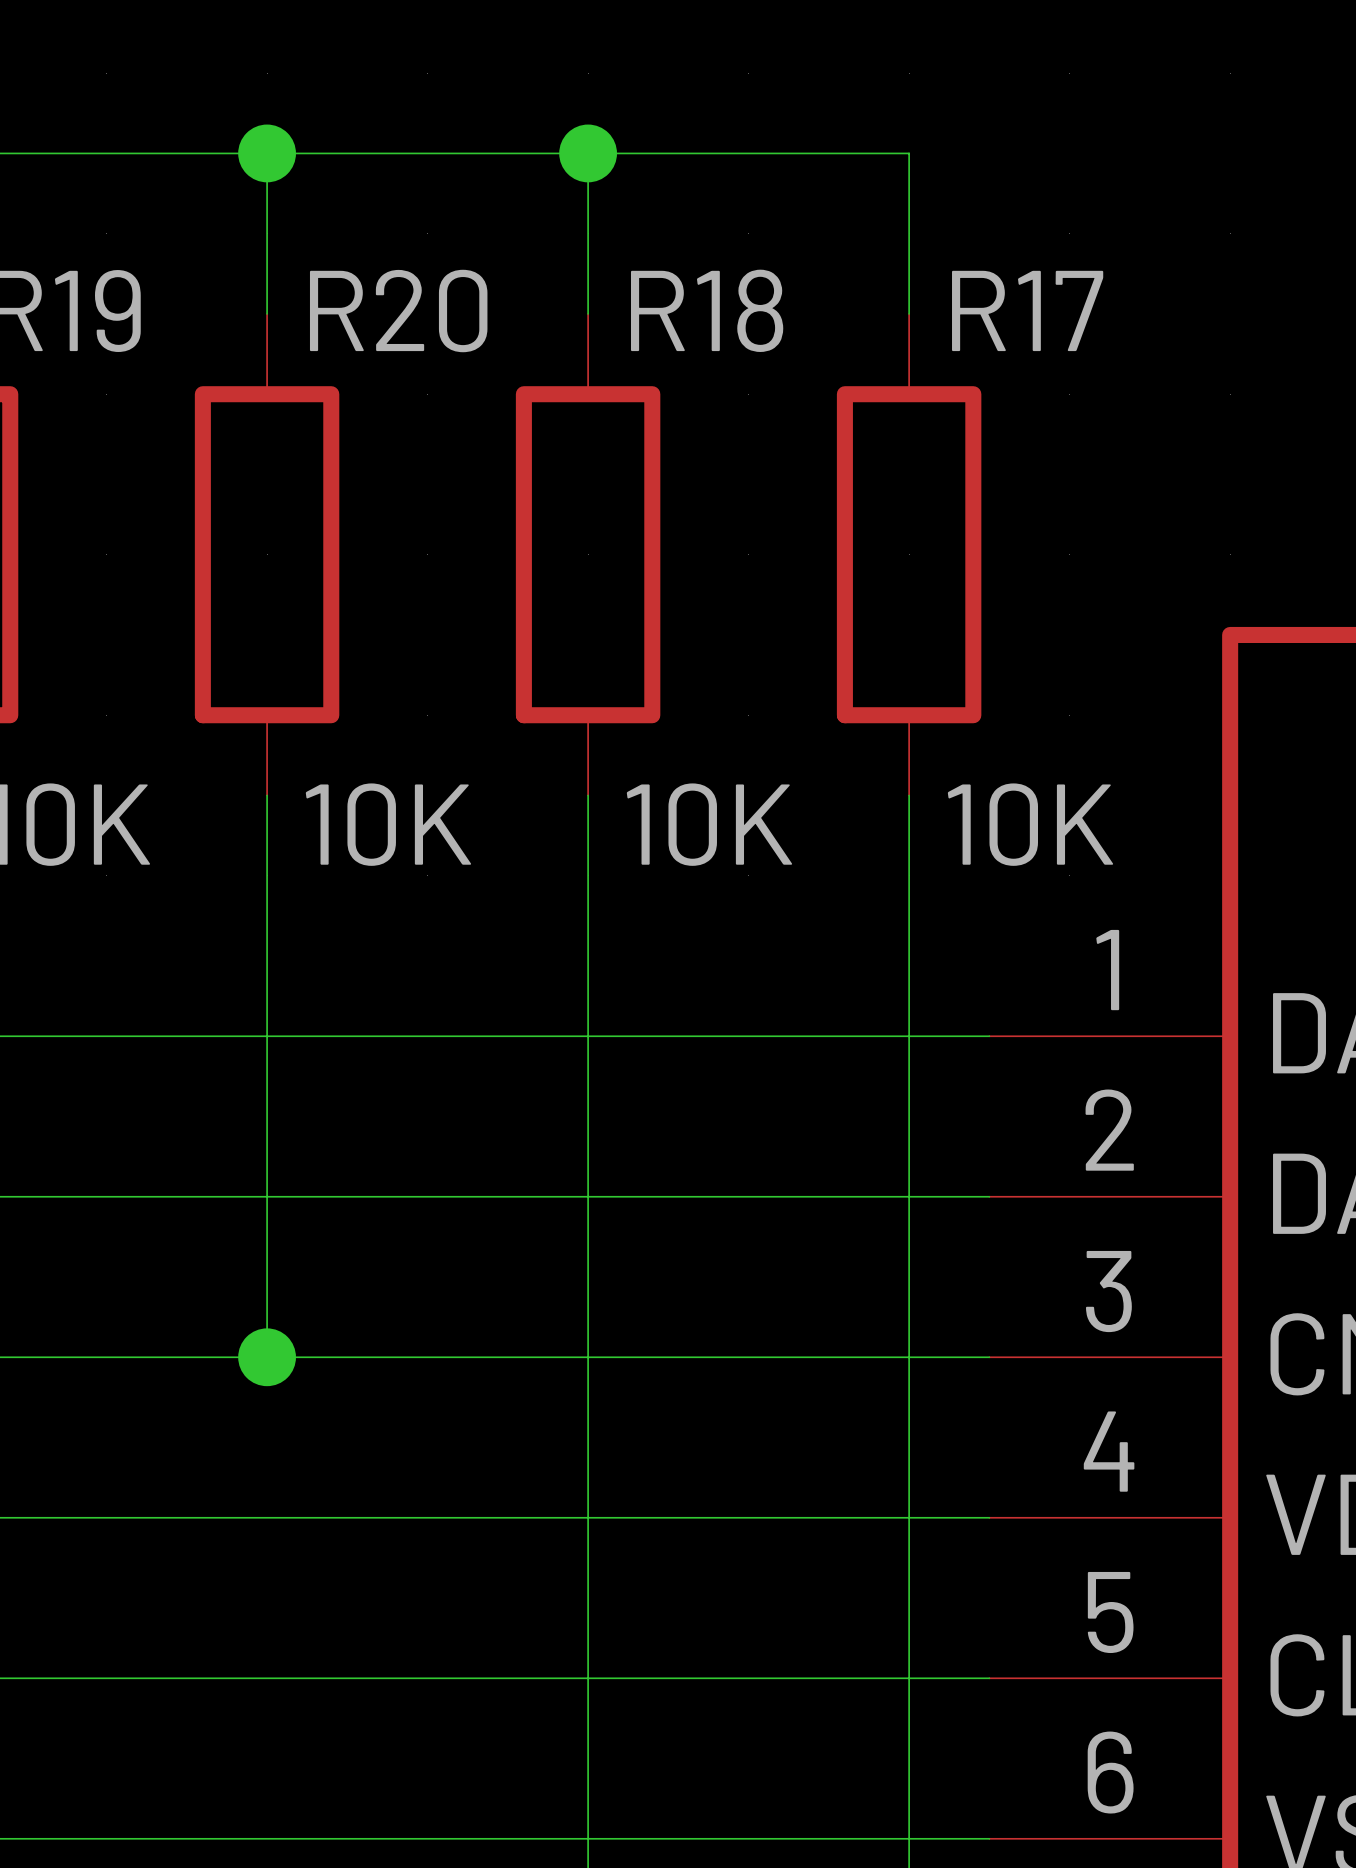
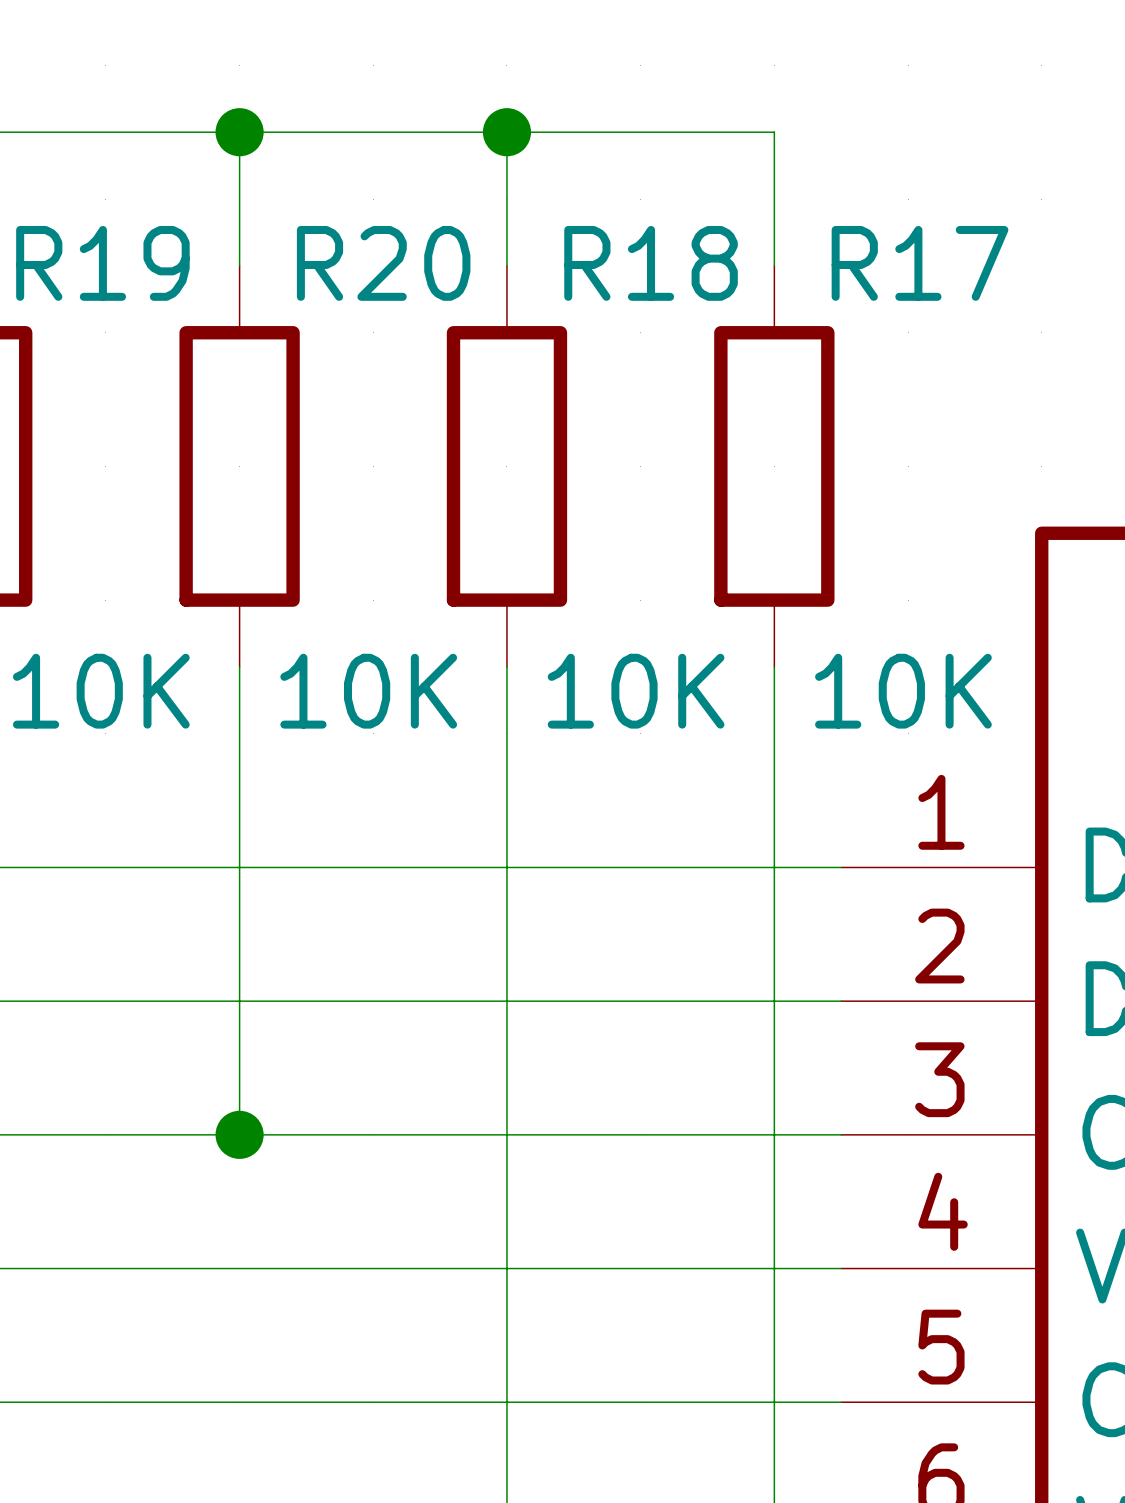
R18 name position: R18 (707, 310) -> R18 (651, 263)
R17 name position: R17 (1027, 310) -> R17 (919, 263)
R20 name position: R20 (398, 311) -> R20 (383, 263)

